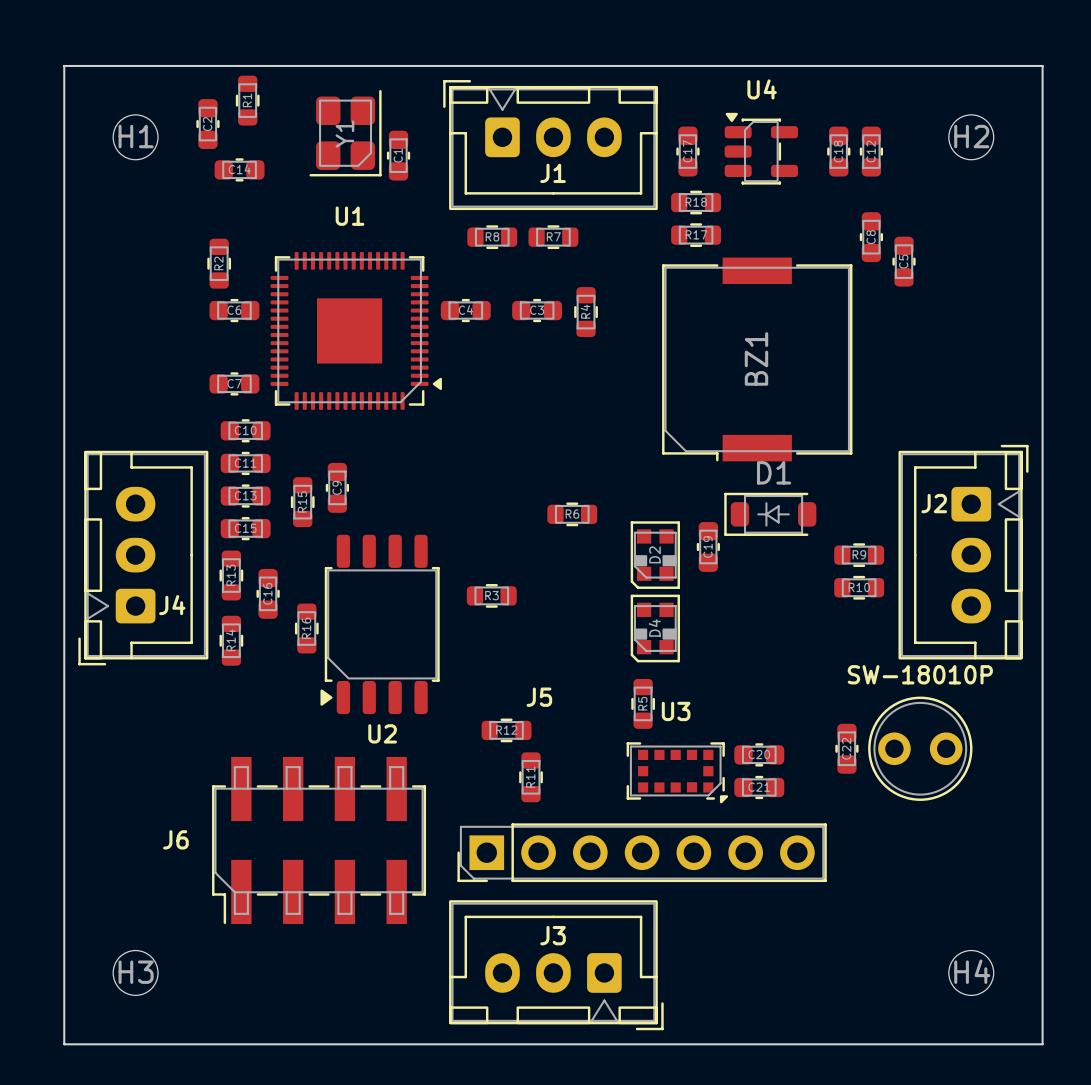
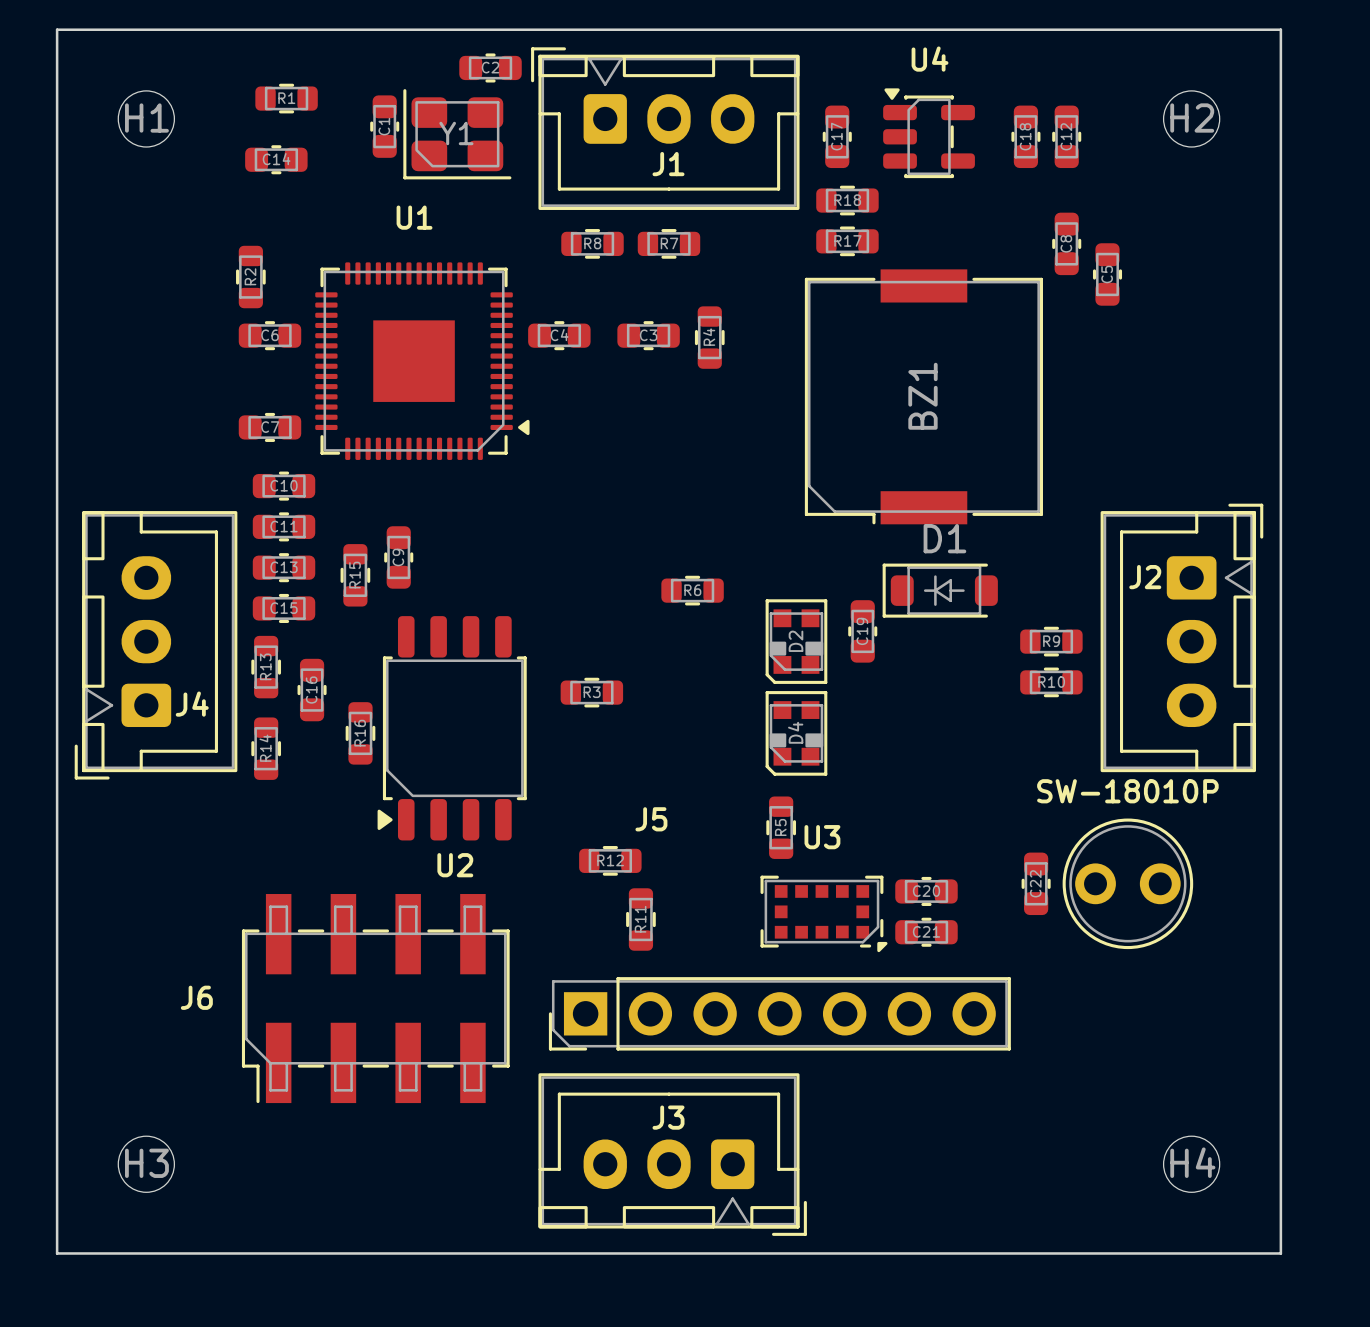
R1 rotation: 0° (247, 100) -> 90° clockwise (286, 98)
C2 rotation: 0° (207, 124) -> 90° clockwise (490, 67)
C2 position: (207, 124) -> (490, 67)
Y1 rotation: 0° (345, 133) -> 90° clockwise (457, 134)
C1 position: (398, 155) -> (384, 126)

